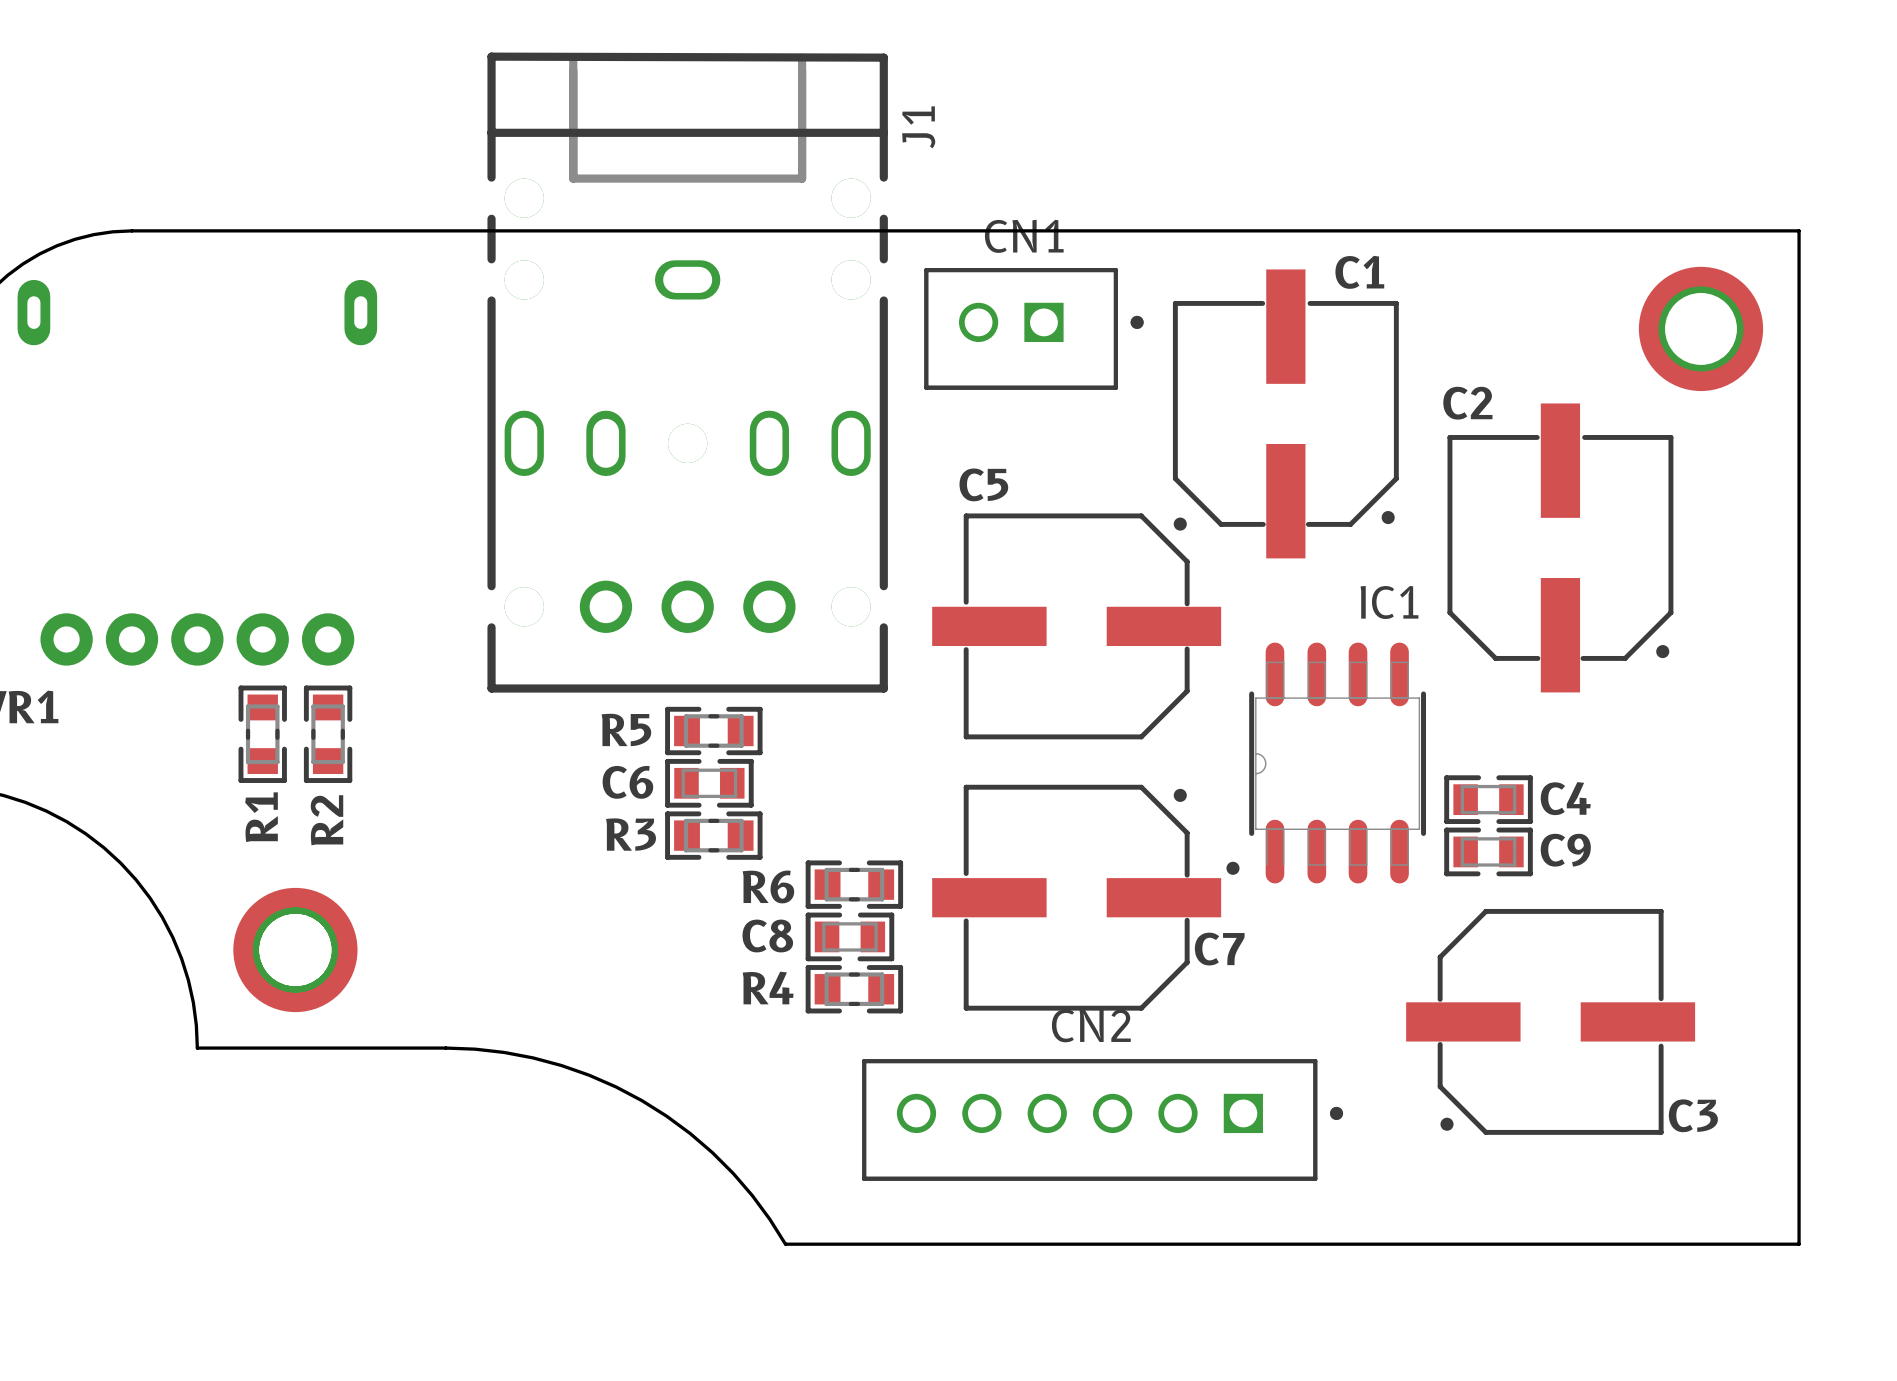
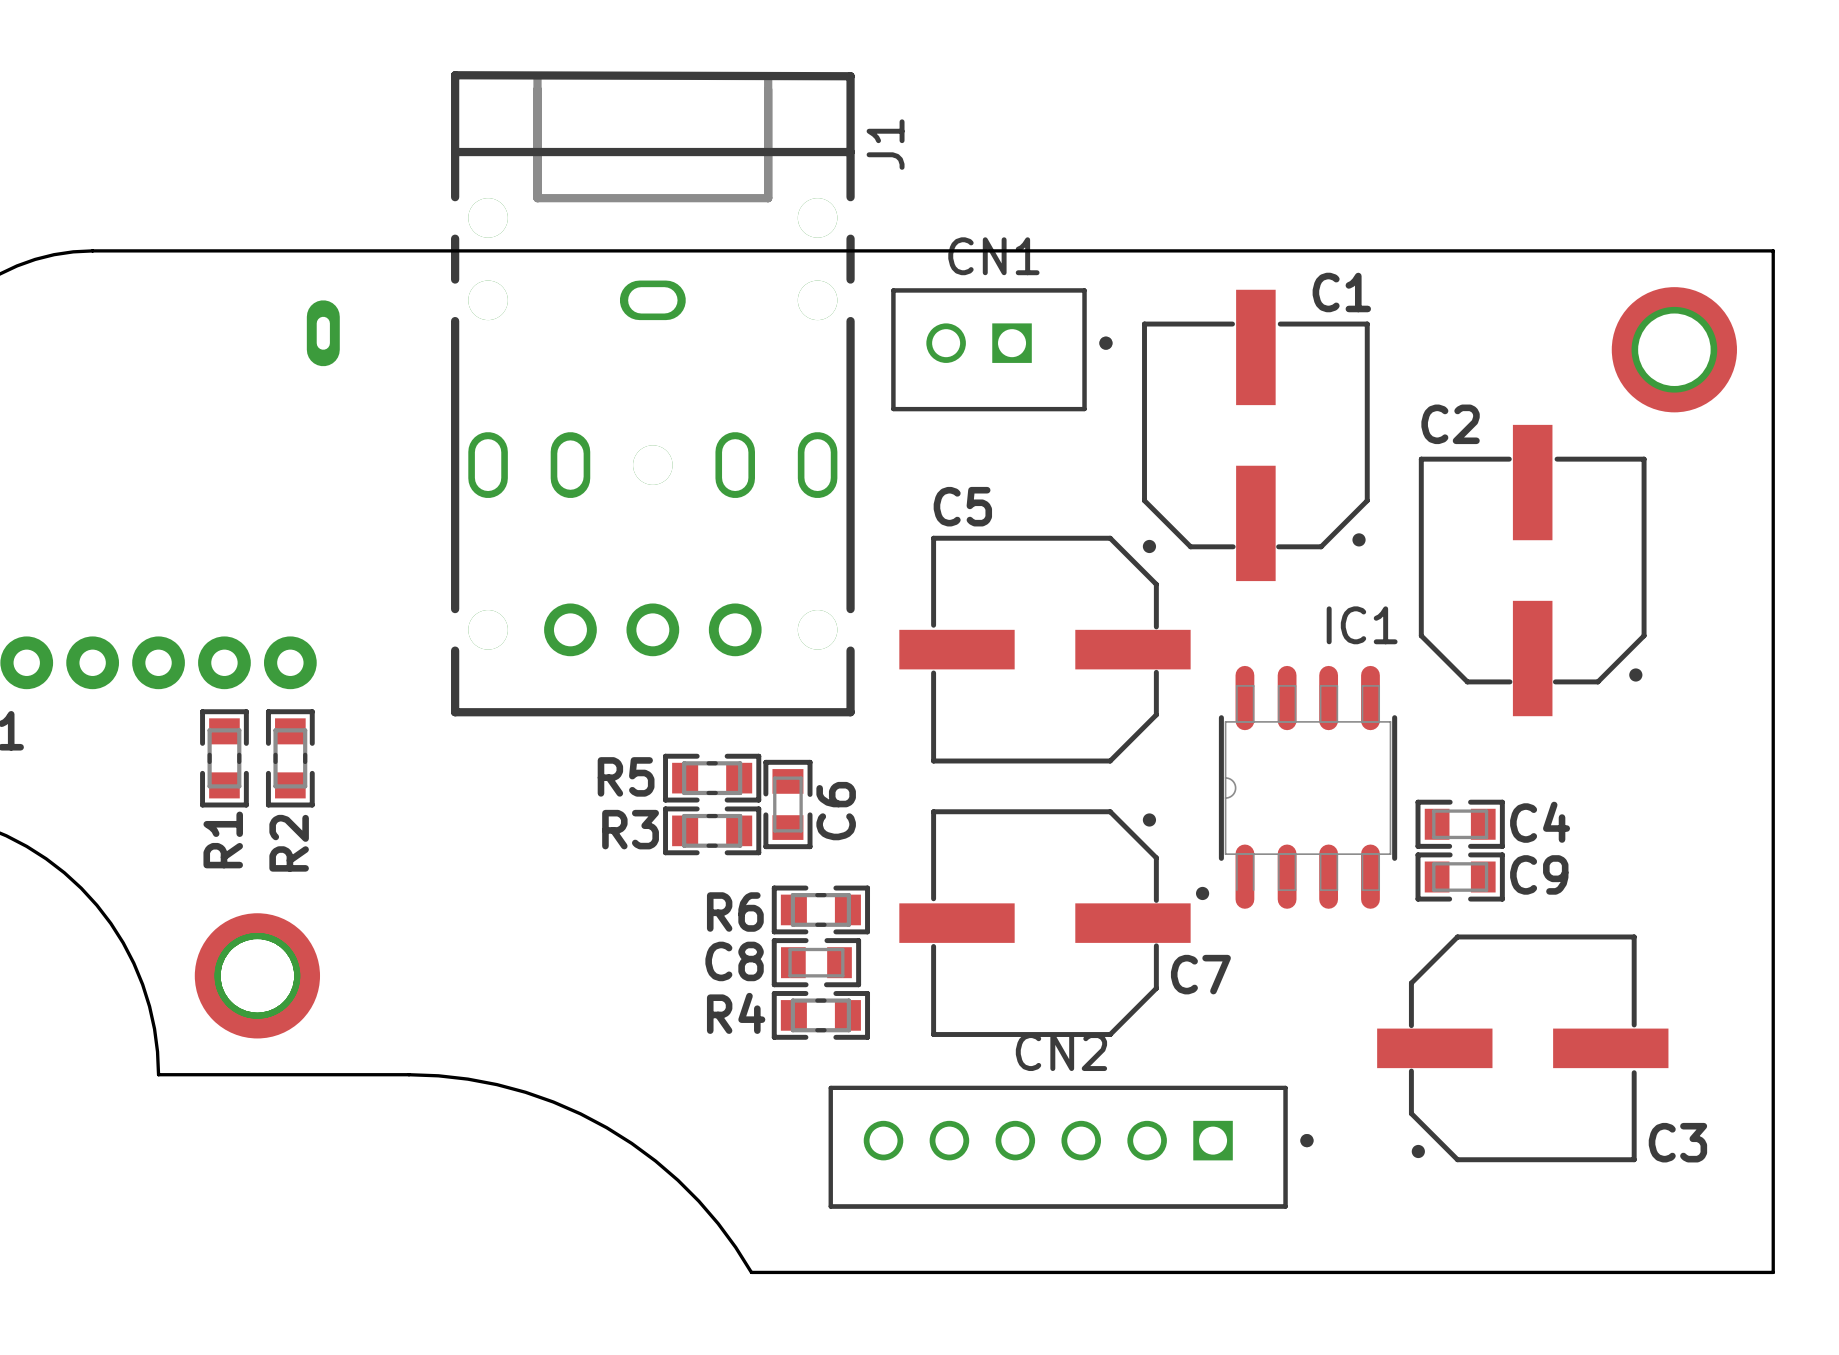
R5 position: (713, 731) -> (712, 778)
C6 name position: C6 (627, 782) -> C6 (836, 811)
C6 rotation: 0° (709, 783) -> 90° clockwise (787, 804)
C6 position: (709, 783) -> (787, 804)
R3 position: (713, 835) -> (712, 830)

